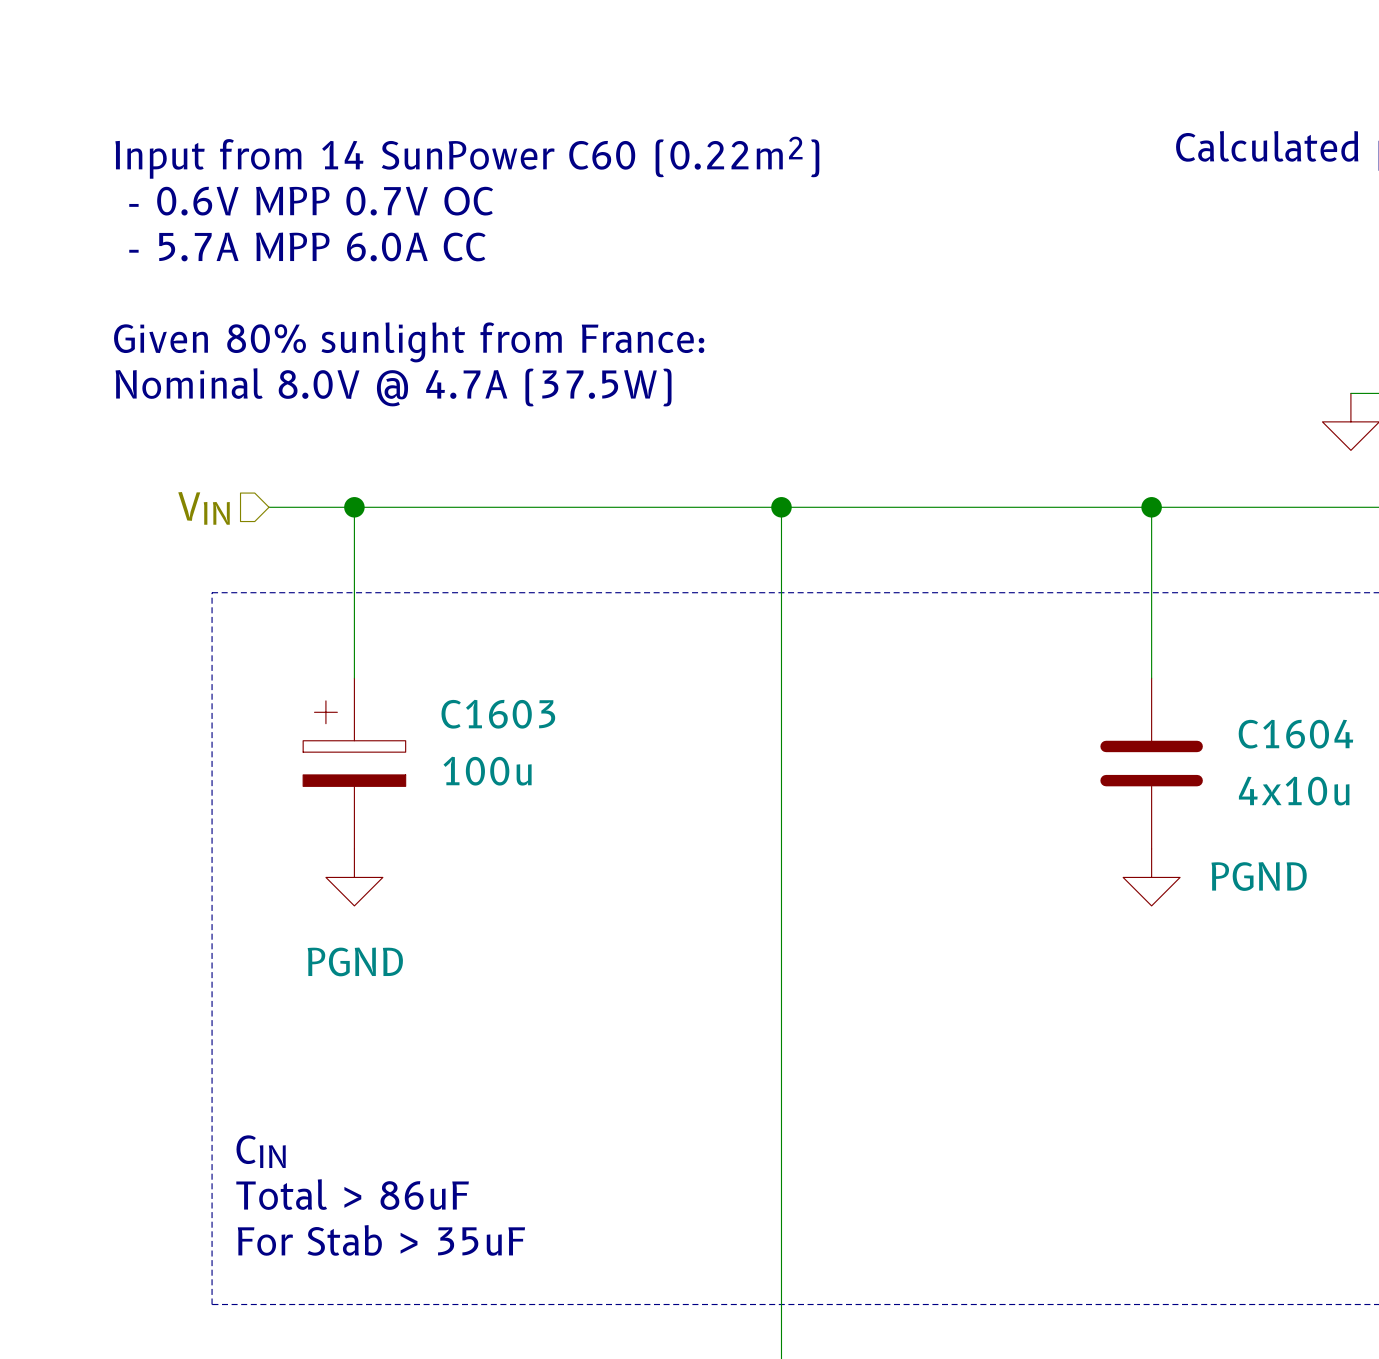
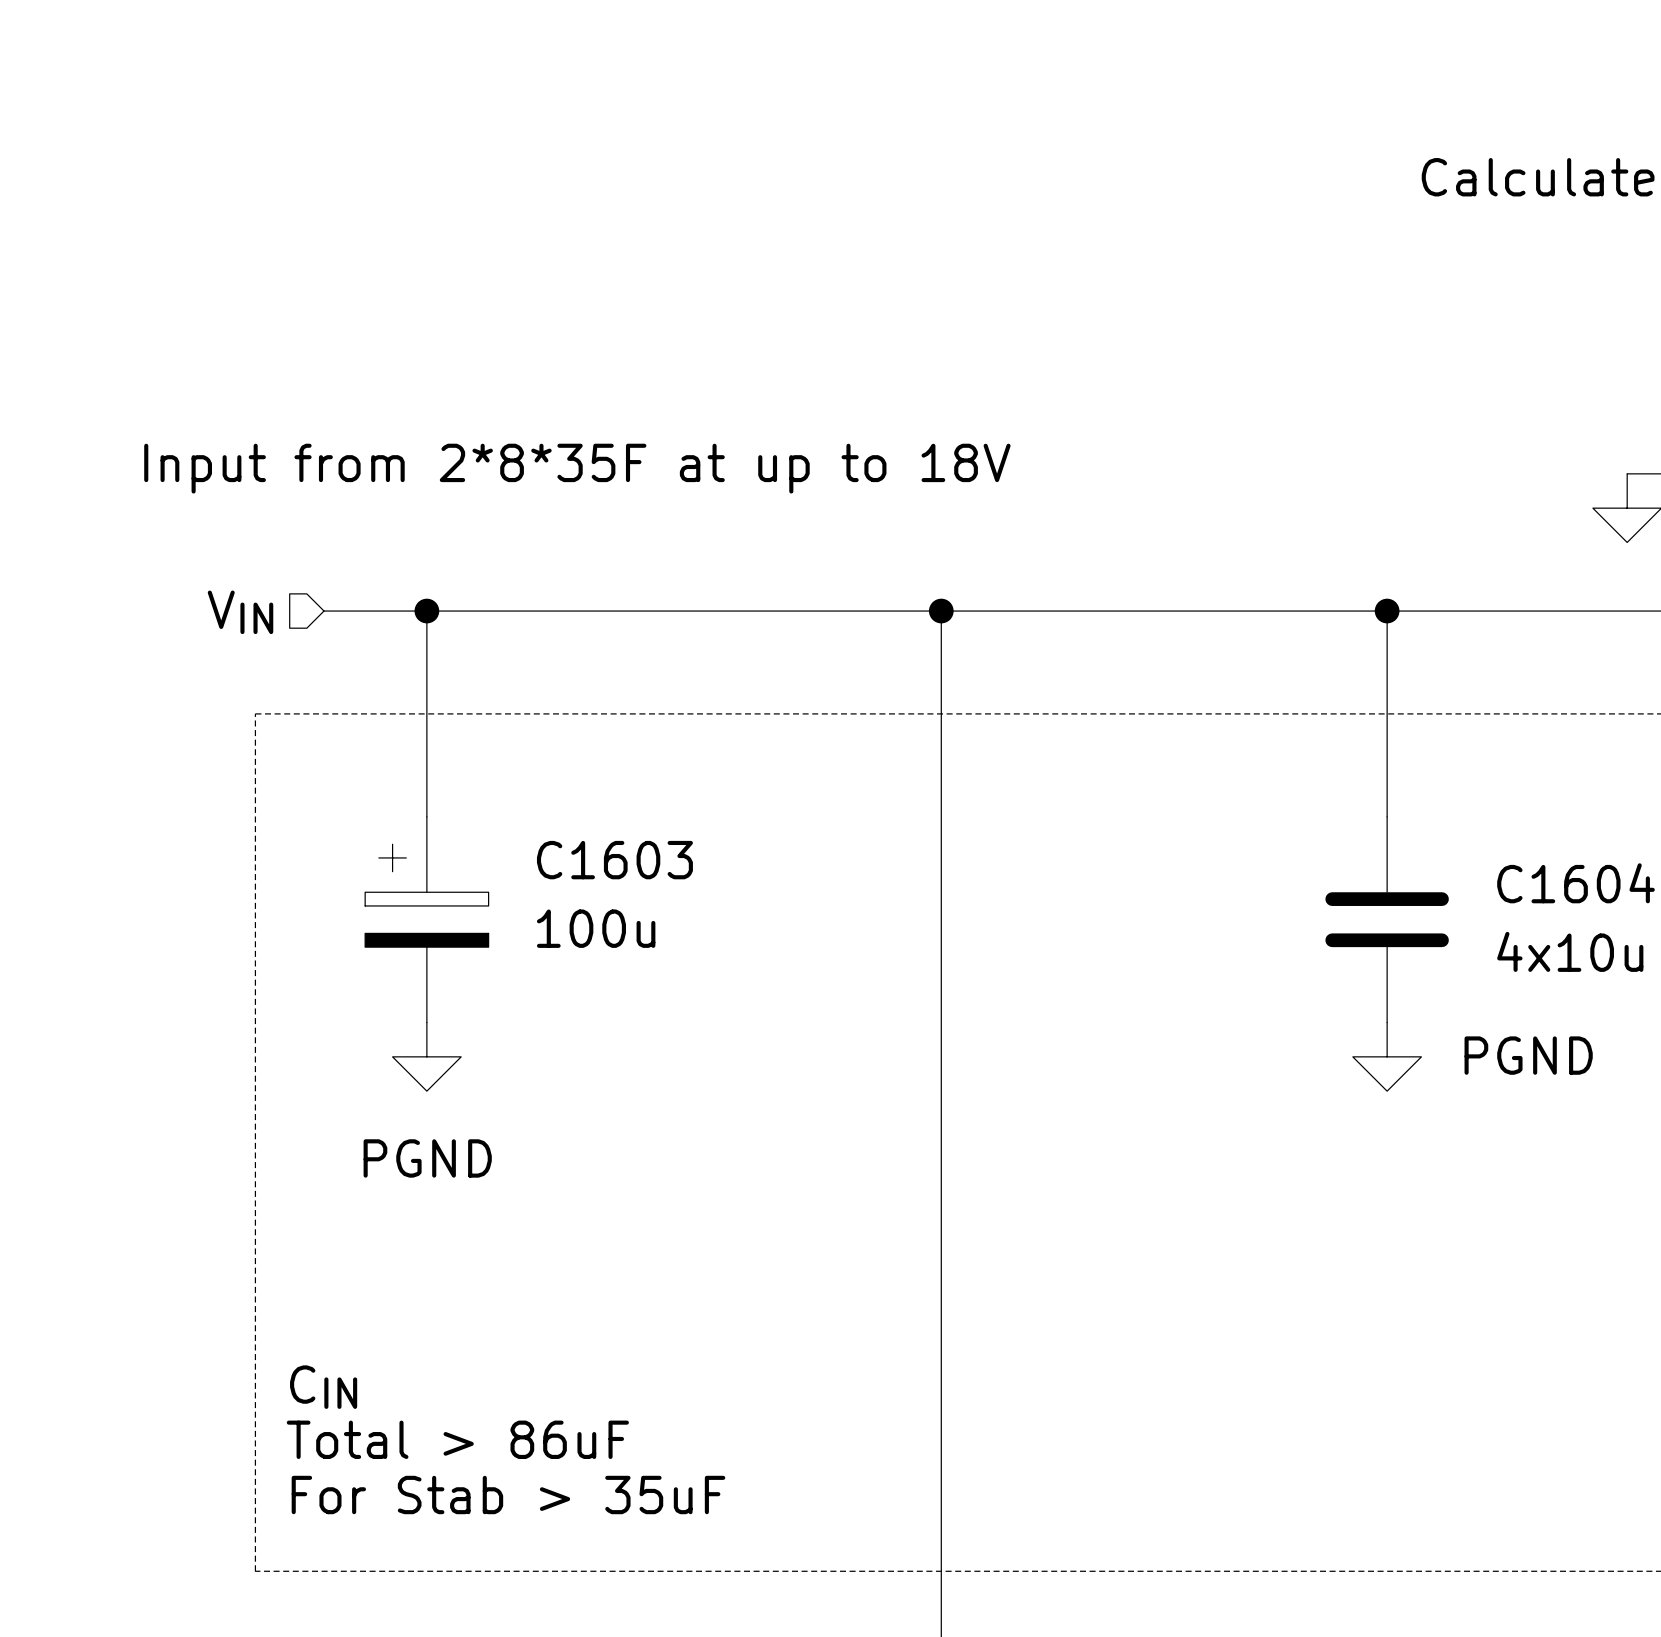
text: Input from 14 SunPower C60 (0.22m2) (467, 157) -> none
text: - 0.6V MPP 0.7V OC (311, 201) -> none
text: - 5.7A MPP 6.0A CC (307, 246) -> none
text: Given 80% sunlight from France: (409, 342) -> none
text: Nominal 8.0V @ 4.7A (37.5W) (393, 387) -> Input from 2*8*35F at up to 18V (577, 468)

